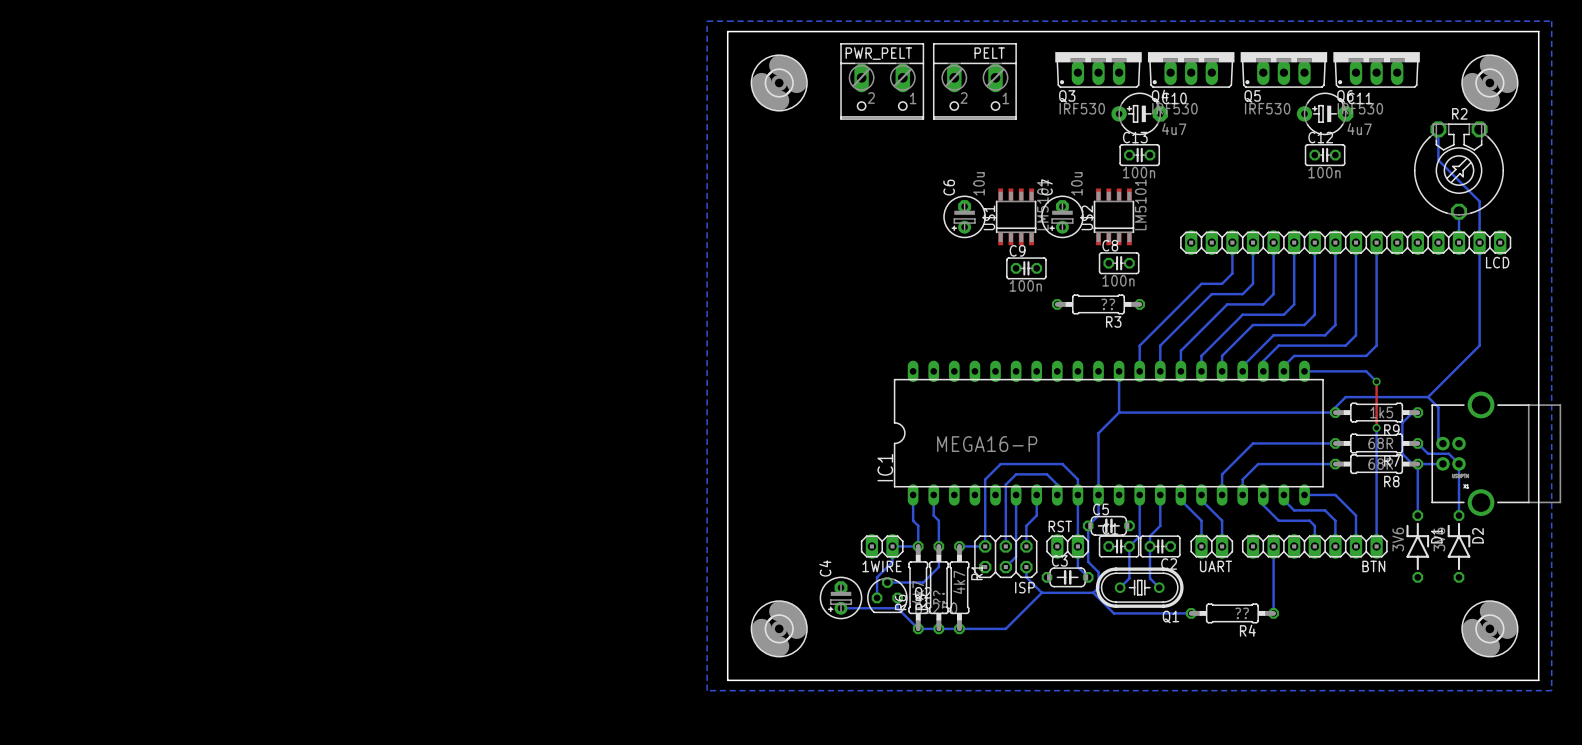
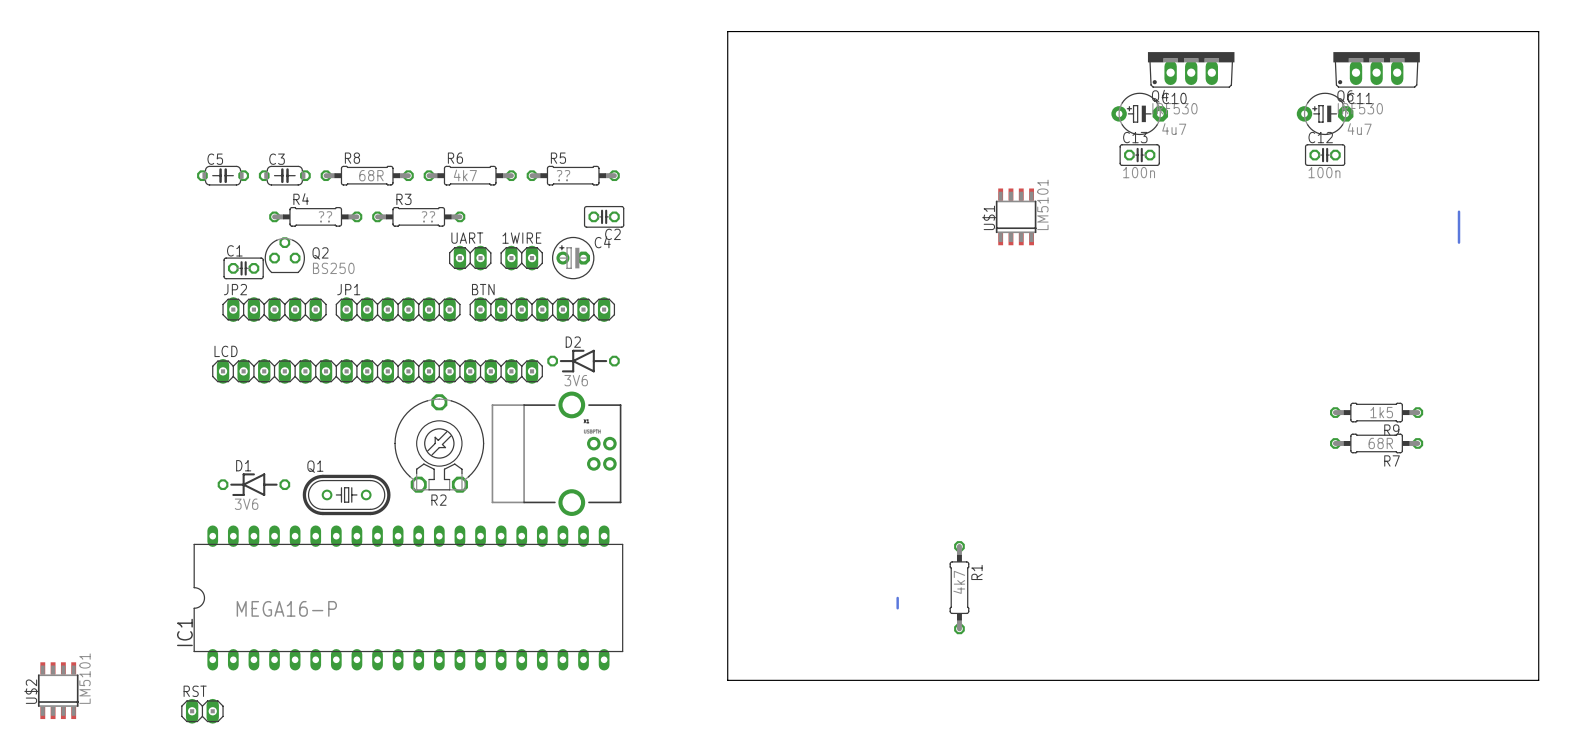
bottom zone outline: (707, 21) (1551, 21) (1551, 690) (707, 690) (707, 21) -> none
Q3: IRF530 (1098, 69) -> none
Q5: IRF530 (1283, 69) -> none
PWR_PELT: (882, 81) -> none
PELT: (974, 81) -> none
part: (779, 82) -> none
part: (1489, 82) -> none
bottom track: (1438, 129) (1438, 160) (1479, 201) (1479, 345) (1428, 397) -> none
R2 rotation: 0° (1459, 170) -> 180° (439, 443)
R2 position: (1459, 170) -> (439, 443)
C6: 10u (964, 216) -> none
C7: 10u (1062, 216) -> none
U$2 position: (1113, 216) -> (58, 690)
bottom track: (1232, 242) (1232, 273) (1222, 283) (1201, 283) (1139, 345) (1139, 371) -> none
bottom track: (1253, 242) (1253, 283) (1242, 294) (1211, 294) (1160, 345) (1160, 371) -> none
bottom track: (1273, 242) (1273, 294) (1263, 304) (1227, 304) (1180, 350) (1180, 371) -> none
bottom track: (1294, 242) (1294, 304) (1283, 314) (1242, 314) (1201, 355) (1201, 371) -> none
bottom track: (1314, 242) (1314, 314) (1304, 325) (1253, 325) (1222, 355) (1222, 371) -> none
bottom track: (1335, 242) (1335, 325) (1325, 335) (1273, 335) (1242, 366) (1242, 371) -> none
LCD: (1345, 242) -> none
bottom track: (1356, 242) (1356, 335) (1345, 345) (1278, 345) (1263, 361) (1263, 371) -> none
bottom track: (1376, 242) (1376, 345) (1366, 355) (1294, 355) (1283, 366) (1283, 371) -> none
UART: none -> (470, 258)
C8: 100n (1119, 263) -> none
C9: 100n (1026, 268) -> none
R3 position: (1098, 304) -> (418, 216)
JP2: none -> (274, 309)
JP1: none -> (398, 309)
BTN: none -> (542, 309)
R3 name position: R3 (1113, 321) -> R3 (403, 199)
LCD: none -> (377, 371)
bottom track: (1119, 371) (1119, 412) -> none
bottom track: (1304, 371) (1366, 371) (1376, 381) -> none
top track: (1376, 381) (1376, 428) -> none
via: (1376, 381) -> none
bottom track: (1428, 397) (1345, 397) (1335, 407) (1335, 412) (1119, 412) -> none
bottom track: (1428, 397) (1438, 407) (1438, 439) (1442, 443) -> none
bottom track: (1119, 412) (1098, 433) (1098, 515) (1088, 525) (1088, 561) (1098, 572) (1098, 587) (1093, 592) -> none
bottom track: (1417, 412) (1412, 412) (1402, 422) (1402, 453) (1412, 464) (1442, 463) -> none
bottom track: (1376, 428) (1376, 546) -> none
via: (1376, 428) -> none
IC1 position: (1108, 433) -> (408, 597)
bottom track: (1335, 443) (1253, 443) (1222, 474) (1222, 494) -> none
bottom track: (1417, 443) (1428, 453) (1448, 453) (1459, 463) (1459, 515) -> none
part rotation: 0° (1496, 453) -> 180° (556, 453)
part position: (1496, 453) -> (556, 453)
bottom track: (1335, 464) (1258, 464) (1242, 479) (1242, 494) -> none
R8 position: (1376, 464) -> (367, 175)
bottom track: (1417, 464) (1417, 515) -> none
R8 name position: R8 (1391, 481) -> R8 (352, 158)
bottom track: (913, 494) (913, 520) (918, 525) (918, 546) (892, 546) (892, 561) (877, 577) (877, 597) -> none
bottom track: (933, 494) (933, 515) (938, 520) (938, 567) (923, 582) (887, 582) -> none
bottom track: (1016, 494) (1016, 556) (1005, 567) -> none
bottom track: (1036, 494) (1036, 515) (1026, 525) (1026, 546) -> none
bottom track: (1057, 494) (1057, 484) (1047, 474) (1016, 474) (1005, 484) (1005, 546) -> none
bottom track: (1139, 494) (1139, 536) (1129, 546) (1129, 578) (1120, 587) -> none
bottom track: (1160, 494) (1160, 525) (1150, 536) (1150, 578) (1159, 587) -> none
bottom track: (1180, 494) (1180, 500) (1201, 520) (1201, 546) -> none
bottom track: (1201, 494) (1201, 500) (1222, 520) (1222, 546) -> none
bottom track: (1263, 494) (1263, 505) (1278, 520) (1309, 520) (1314, 525) (1314, 546) -> none
bottom track: (1283, 494) (1283, 500) (1294, 510) (1325, 510) (1335, 520) (1335, 546) -> none
bottom track: (1304, 494) (1335, 494) (1356, 515) (1356, 546) -> none
C5 position: (1108, 525) -> (223, 175)
1WIRE position: (882, 546) -> (521, 258)
bottom track: (959, 546) (985, 546) (985, 479) (1000, 464) (1062, 464) (1077, 479) (1077, 567) (1088, 577) -> none
RST: (1067, 546) -> none
C1 position: (1119, 546) -> (243, 268)
C2 position: (1160, 546) -> (604, 216)
UART: (1211, 546) -> none
bottom track: (1273, 546) (1273, 613) -> none
BTN: (1314, 546) -> none
D1 rotation: 0° (1417, 546) -> 90° counterclockwise (253, 484)
D1 position: (1417, 546) -> (253, 484)
D2 rotation: 0° (1459, 546) -> 90° counterclockwise (583, 361)
D2 position: (1459, 546) -> (583, 361)
ISP: (1005, 556) -> none
1WIRE name position: 1WIRE (882, 566) -> 1WIRE (521, 238)
bottom track: (1026, 567) (1026, 577) (1041, 592) -> none
C3 position: (1067, 577) -> (284, 175)
R6 rotation: 0° (918, 587) -> 90° clockwise (470, 175)
R6 position: (918, 587) -> (470, 175)
R5 rotation: 0° (938, 587) -> 90° clockwise (573, 175)
R5 position: (938, 587) -> (573, 175)
Q1 position: (1139, 587) -> (346, 494)
bottom track: (1041, 592) (1093, 592) -> none
bottom track: (1041, 592) (1005, 628) (918, 628) (897, 608) (841, 608) -> none
bottom track: (1093, 592) (1113, 613) (1191, 613) -> none
Q2 position: (887, 595) -> (284, 255)
C4 rotation: 0° (841, 597) -> 90° clockwise (573, 258)
C4 position: (841, 597) -> (573, 258)
R4 position: (1232, 613) -> (315, 216)
Q1 name position: Q1 (1170, 616) -> Q1 (315, 466)
part: (779, 628) -> none
part: (1489, 628) -> none
R4 name position: R4 (1247, 630) -> R4 (301, 199)
RST: none -> (202, 711)

